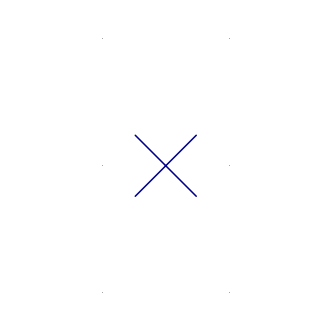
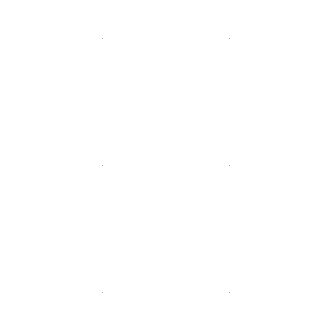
no-connect mark: (165, 165) -> none

